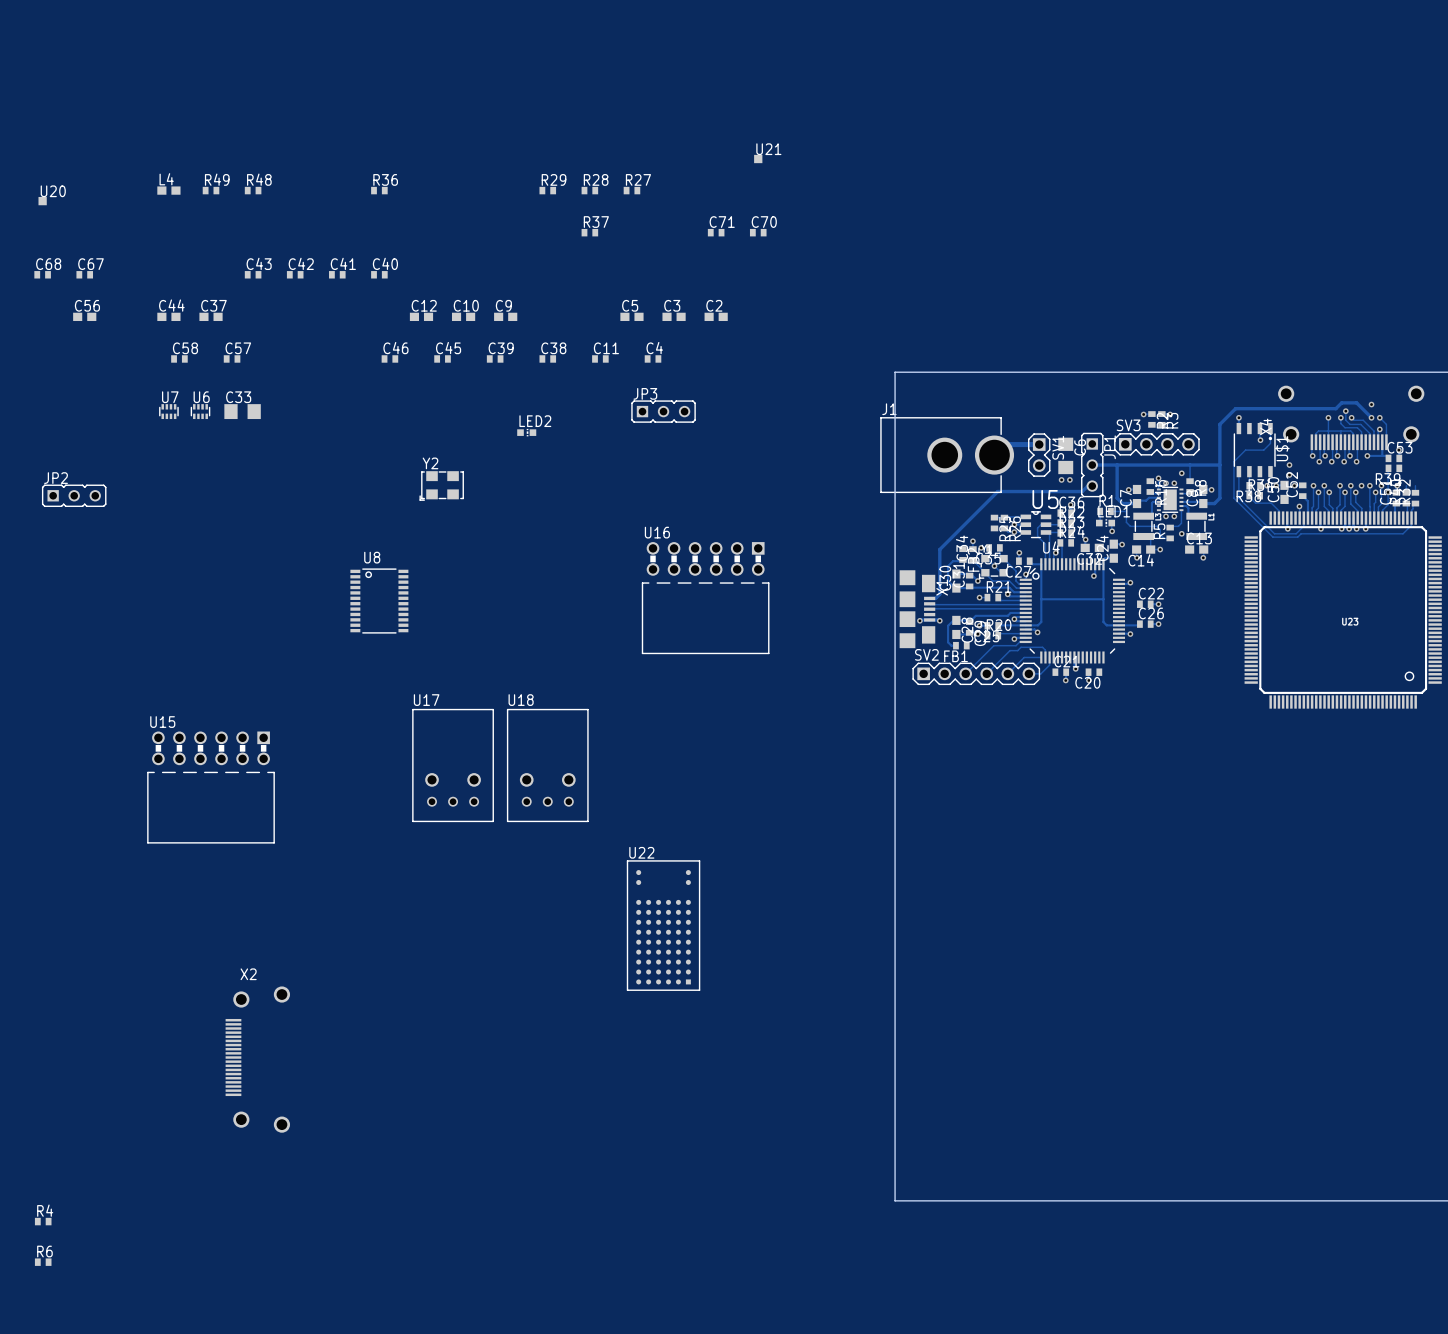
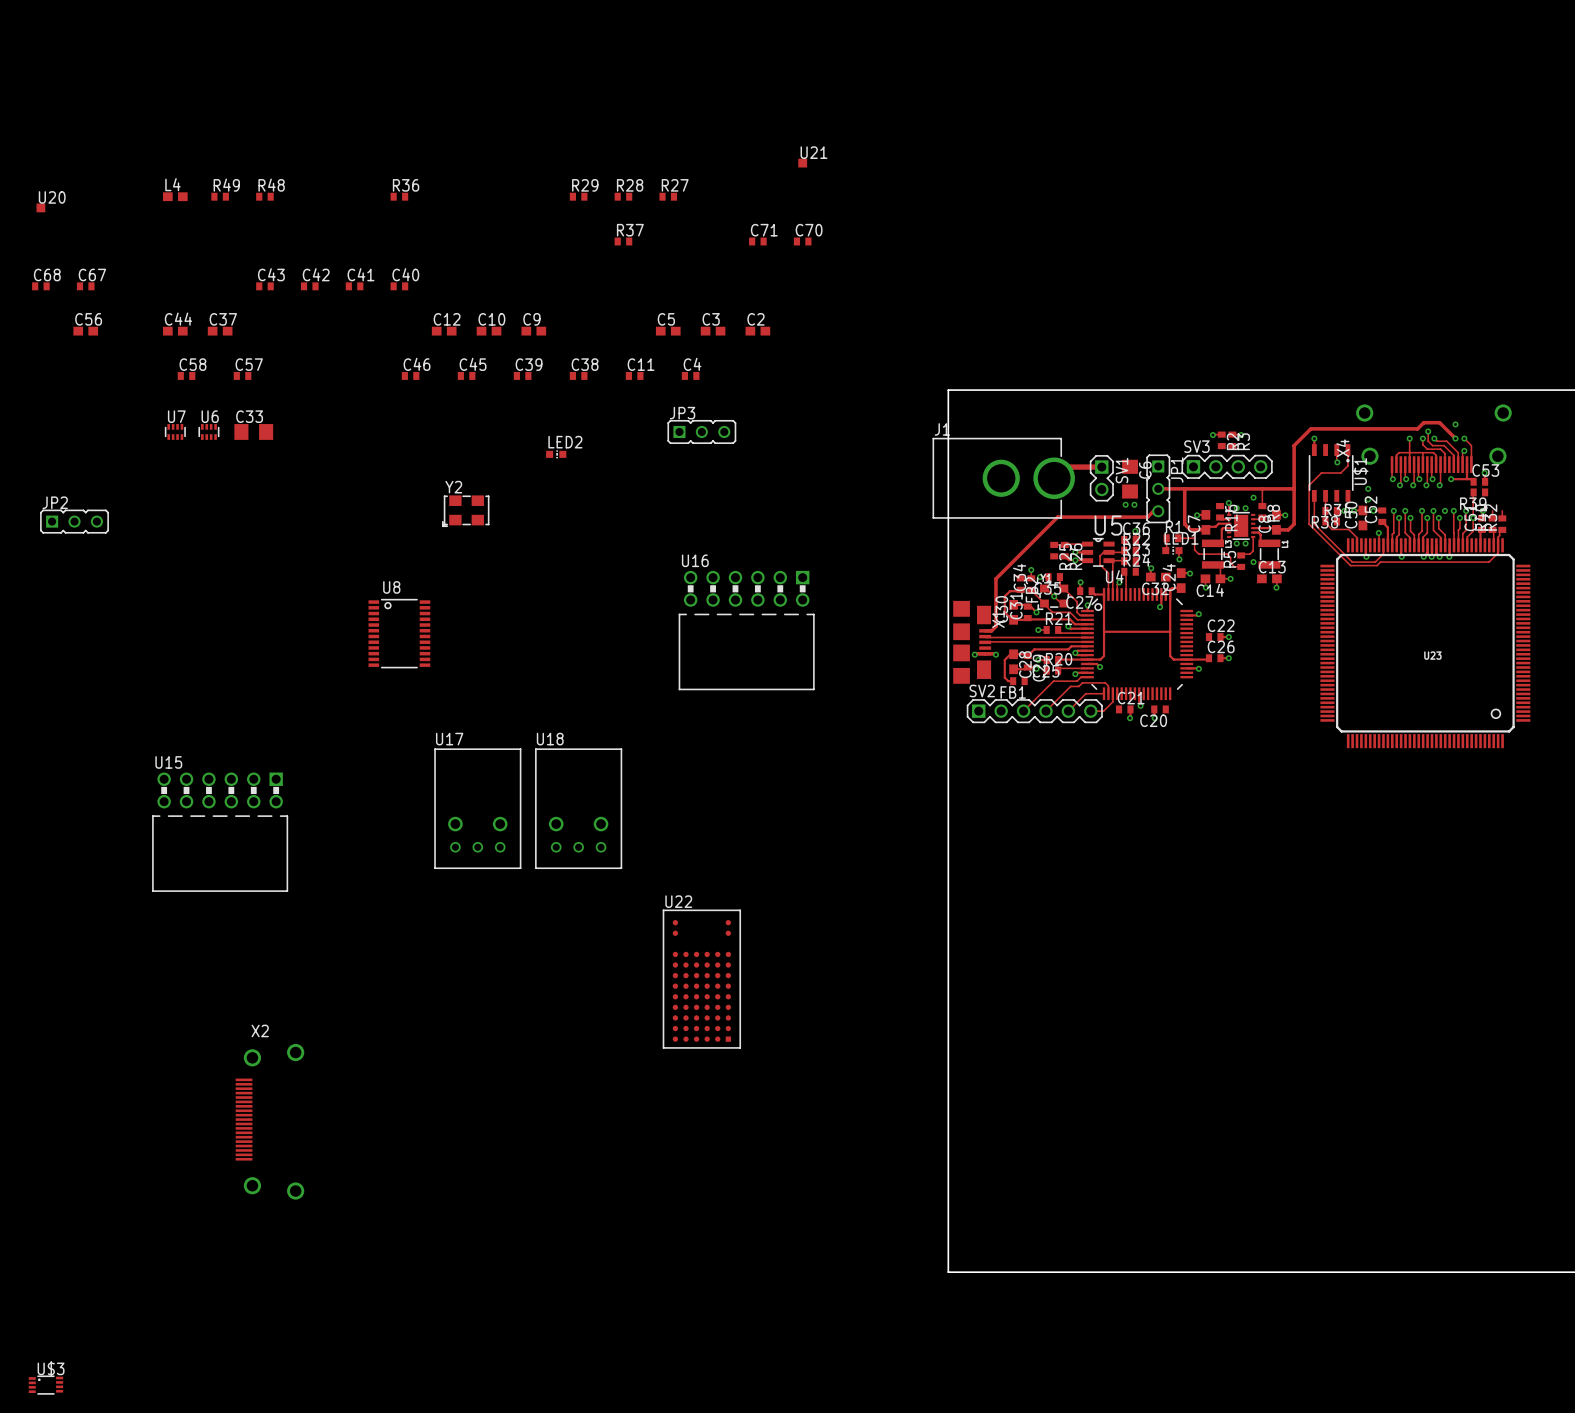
R4: (43, 1221) -> none
R6: (43, 1262) -> none
U$3: none -> (45, 1385)

